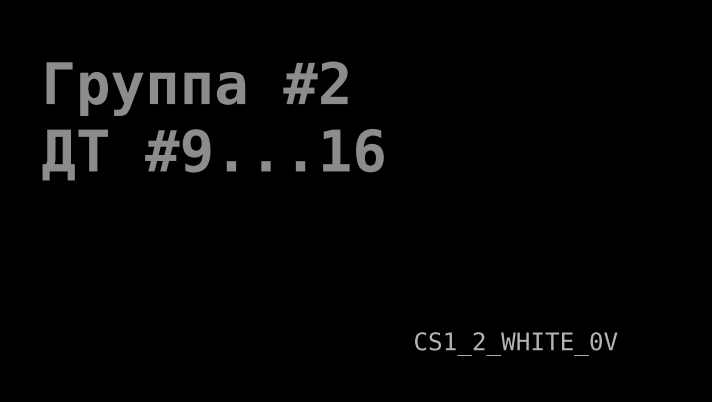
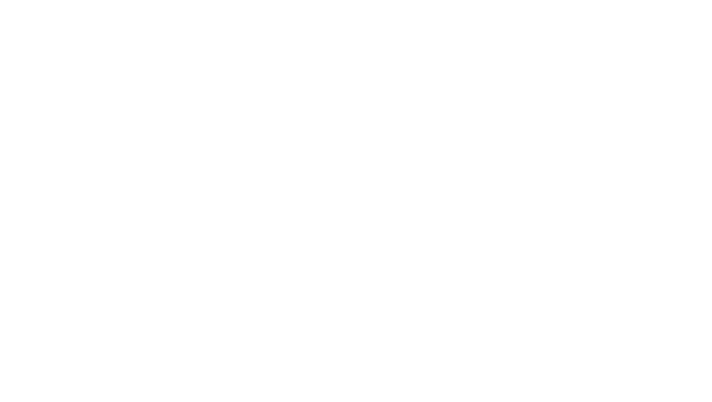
text: Группа #2 (197, 88) -> none
text: ДТ #9...16 (213, 154) -> none
label: CS1_2_WHITE_0V (516, 344) -> none

